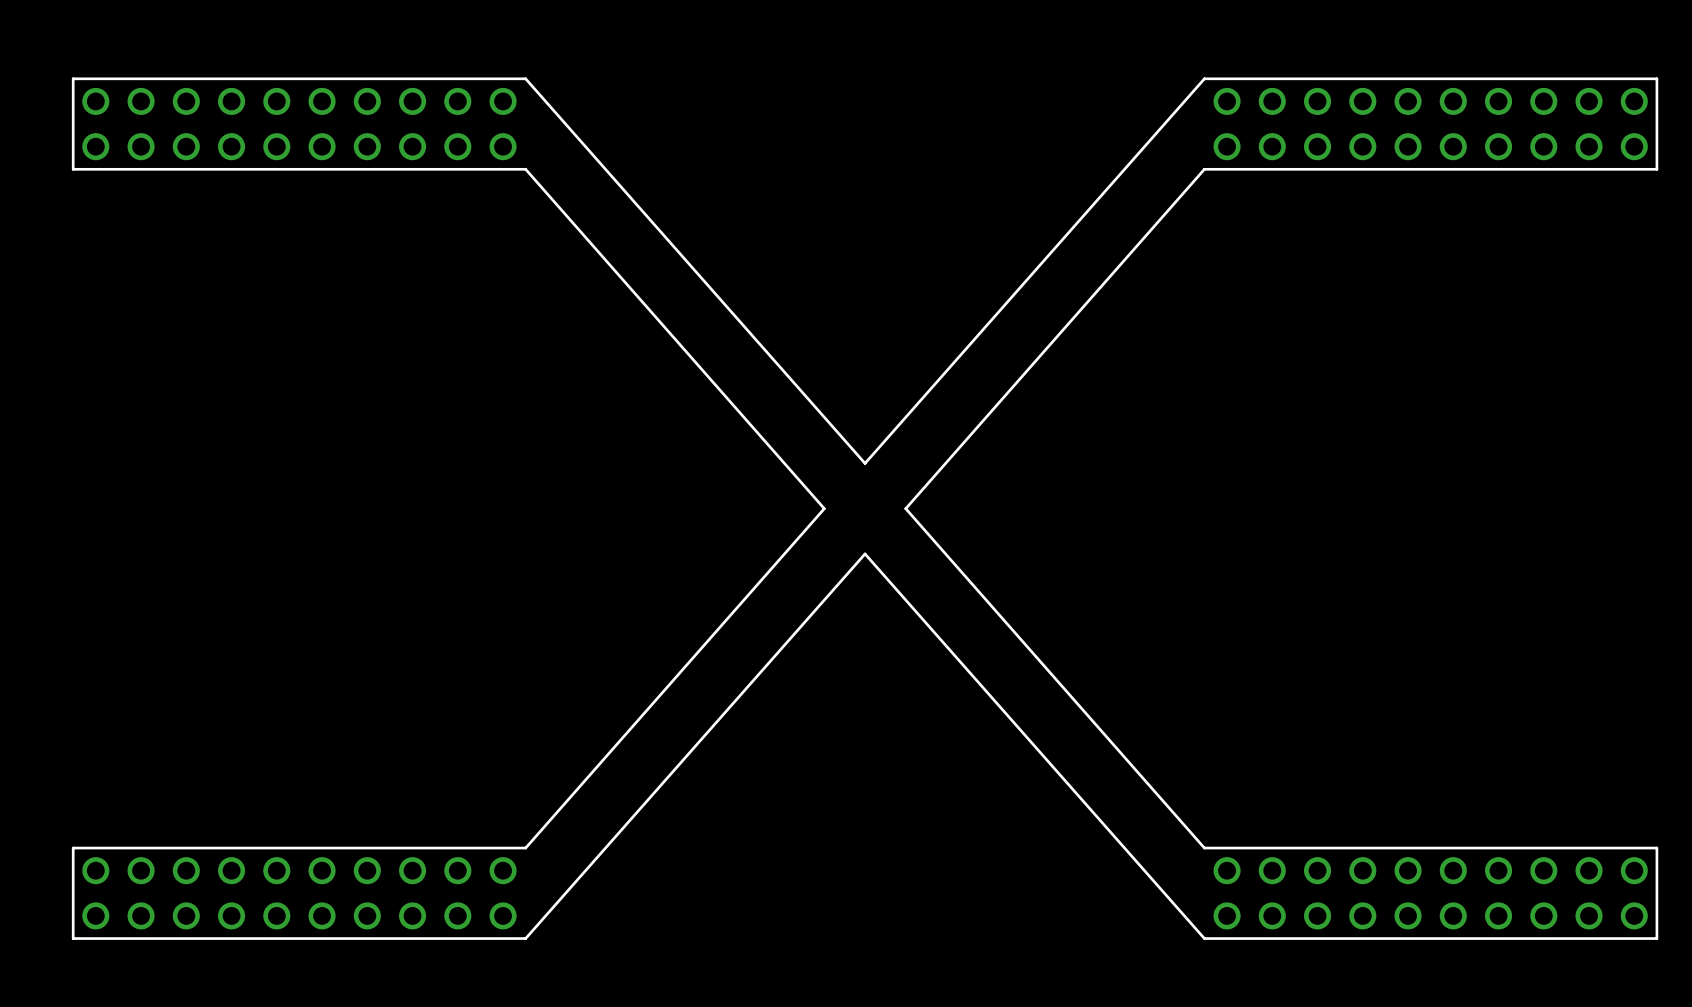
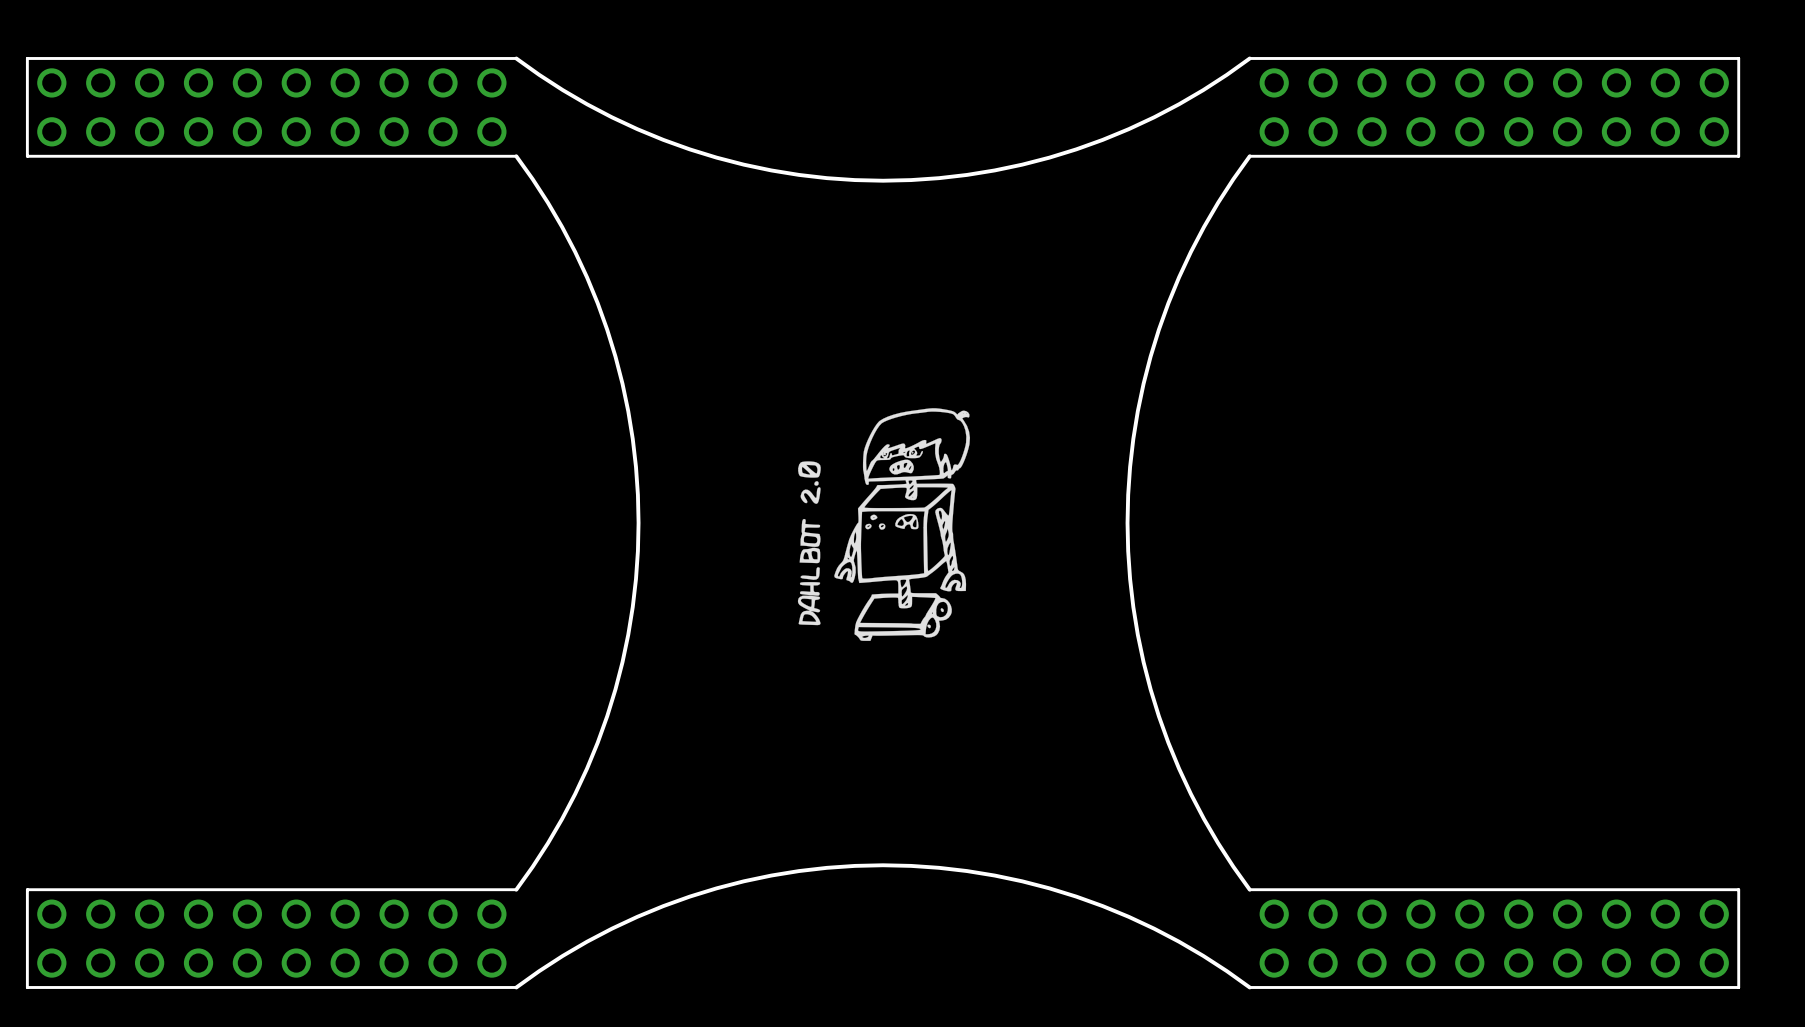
board edge: (1204, 78) (865, 463) (525, 78) -> (1249, 58) (1179, 104) (1128, 129) (1076, 149) (1022, 164) (967, 174) (883, 180) (826, 178) (771, 170) (689, 149) (611, 117) (562, 90) (516, 58)
board edge: (525, 169) (824, 508) (525, 848) -> (516, 156) (562, 226) (587, 277) (607, 329) (628, 411) (635, 466) (638, 522) (635, 579) (628, 634) (607, 716) (575, 794) (547, 843) (516, 889)
board edge: (1204, 169) (905, 508) (1204, 848) -> (1249, 156) (1218, 202) (1190, 251) (1158, 329) (1137, 411) (1130, 466) (1127, 522) (1133, 607) (1143, 662) (1158, 716) (1190, 794) (1218, 843) (1249, 889)
drawing: none -> [797, 408, 971, 641]
board edge: (1204, 938) (865, 553) (525, 938) -> (1249, 987) (1179, 941) (1128, 916) (1076, 896) (1022, 881) (967, 871) (883, 865) (799, 871) (743, 881) (689, 896) (611, 928) (562, 955) (516, 987)

